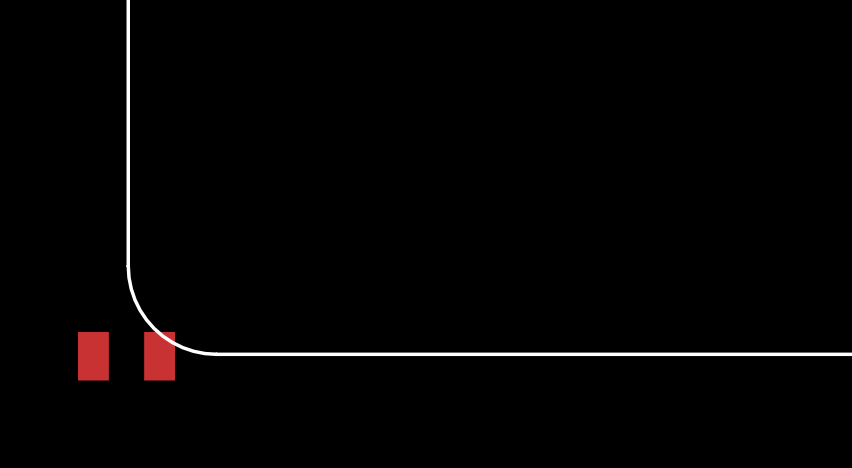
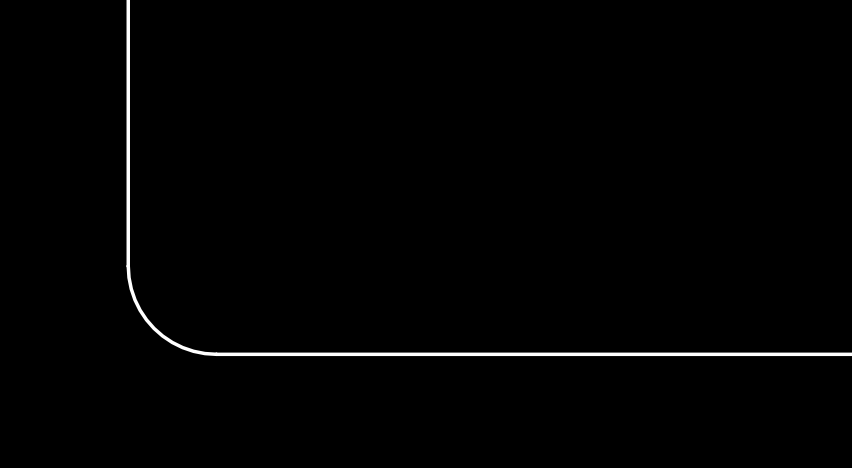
part: (126, 356) -> none

